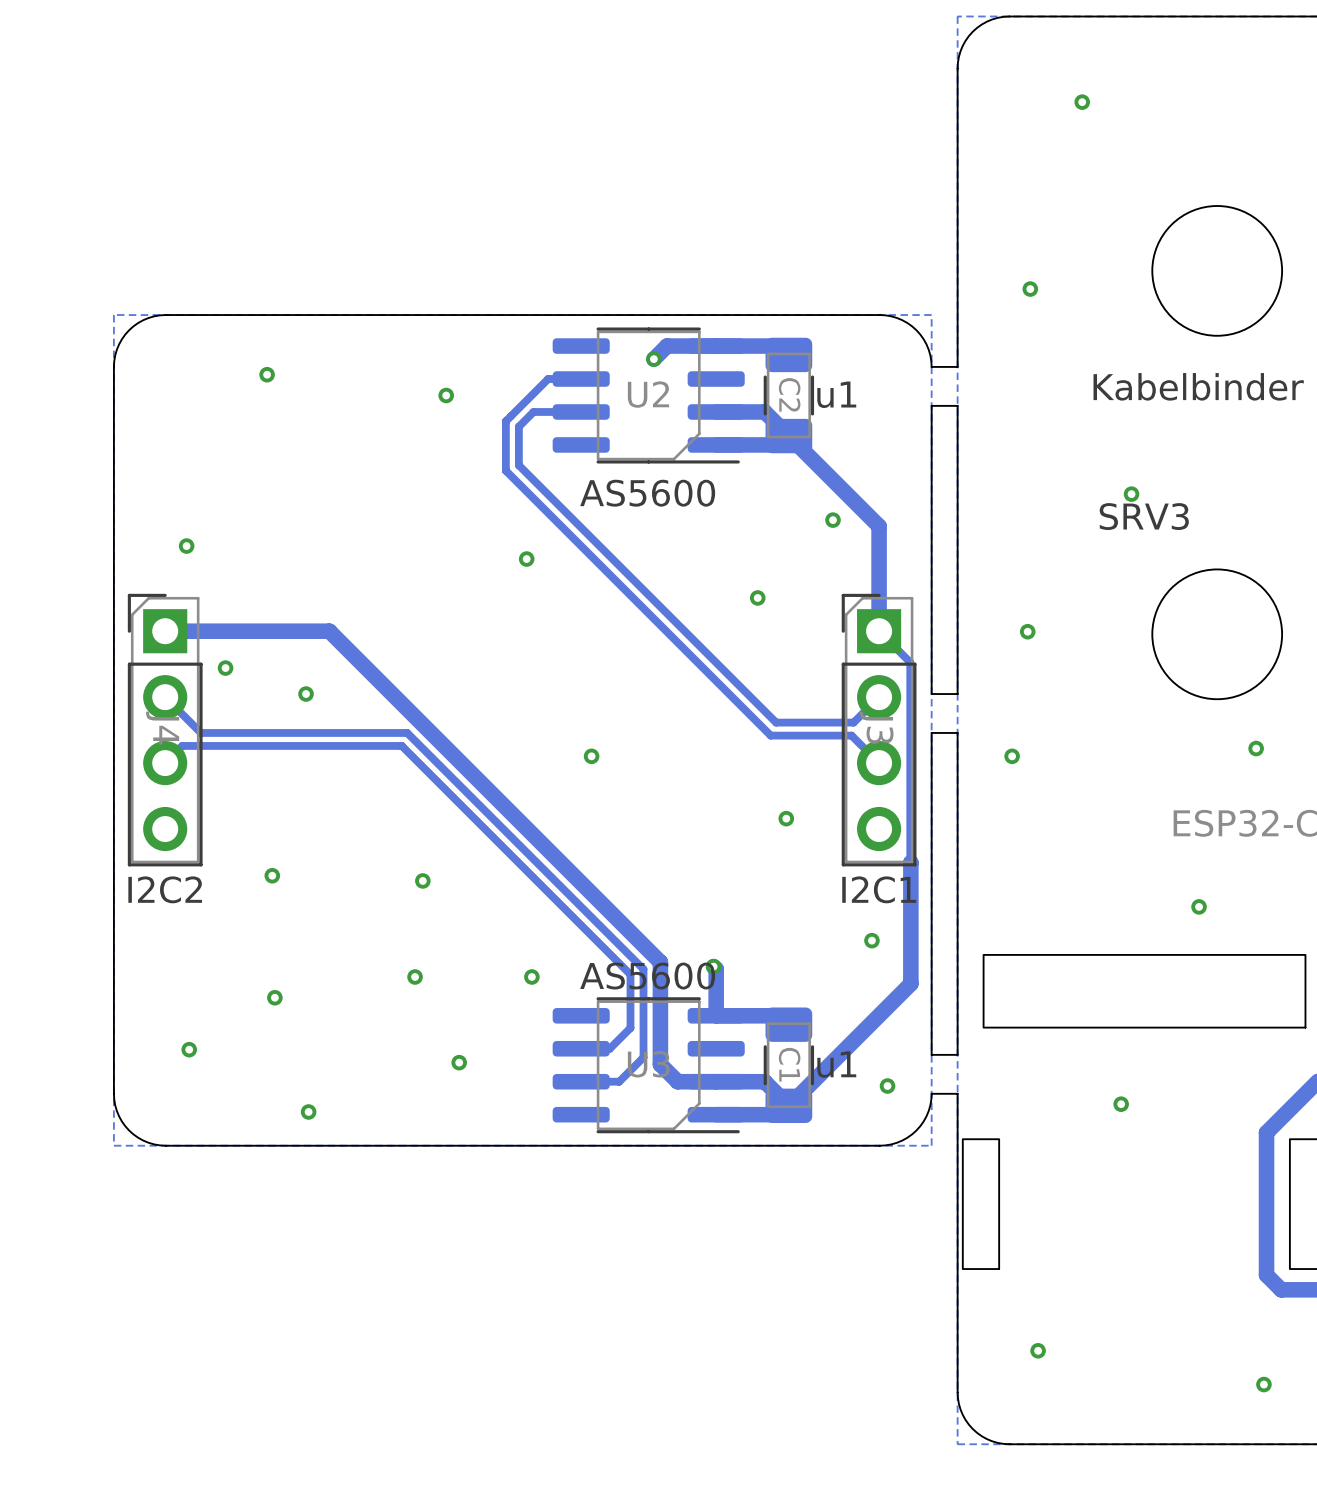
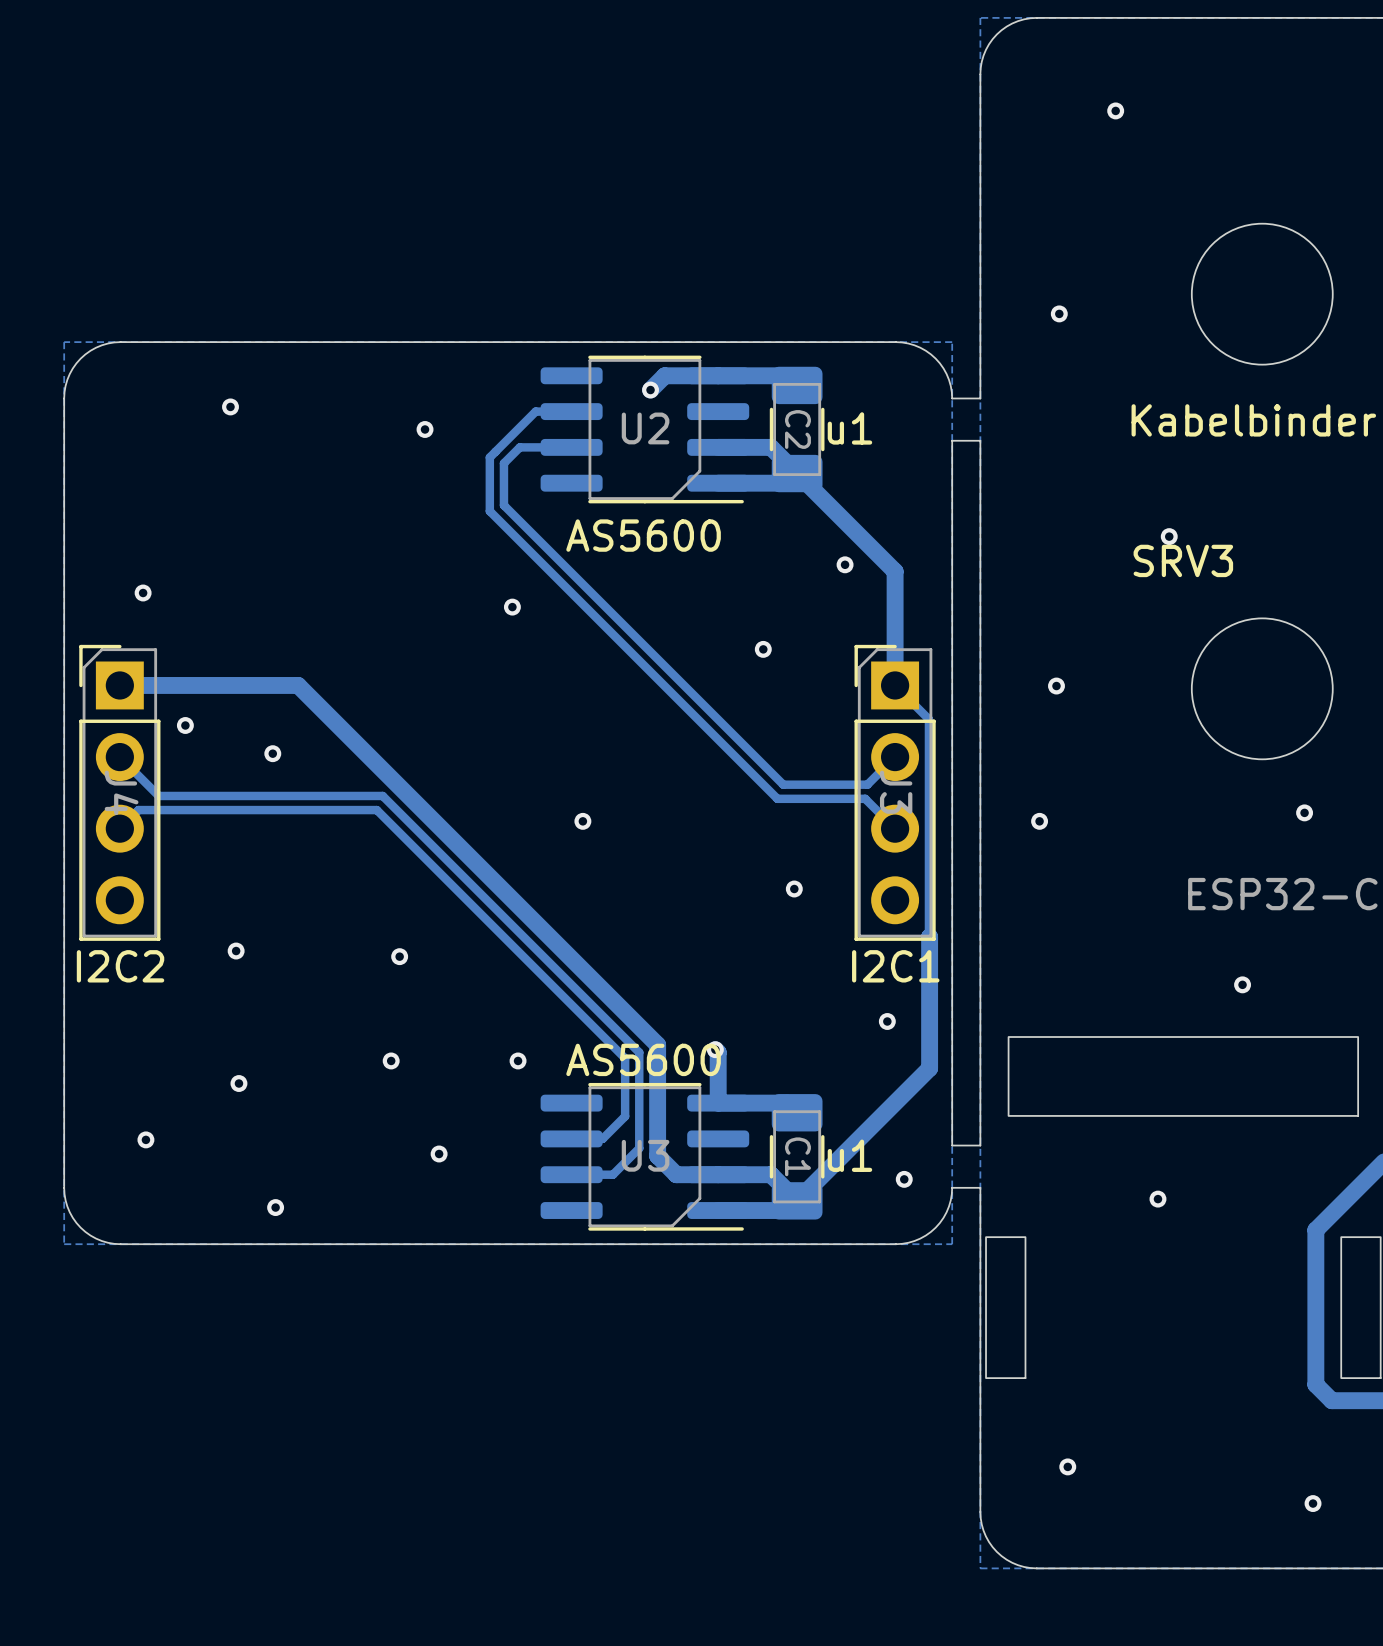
board edge: (957, 694) (931, 694) -> (980, 753) (980, 795)
board edge: (957, 732) (931, 732) -> (952, 753) (952, 795)

